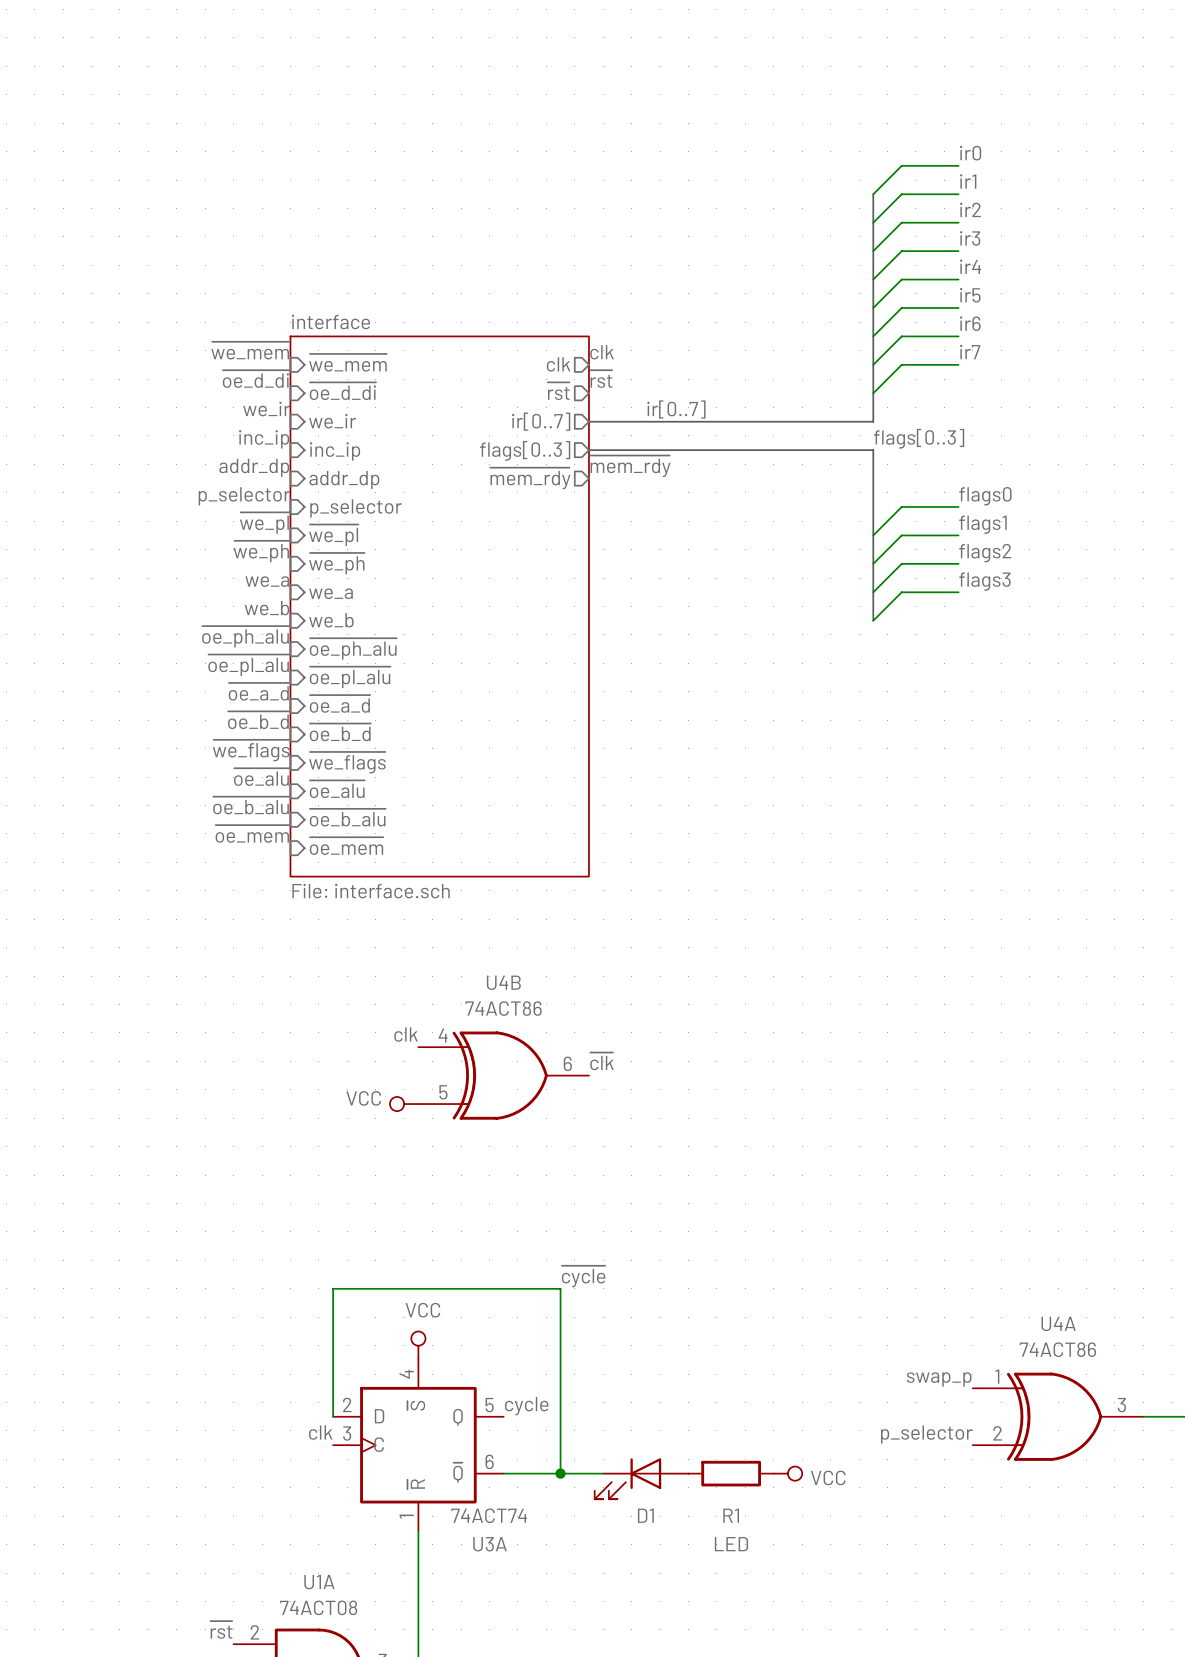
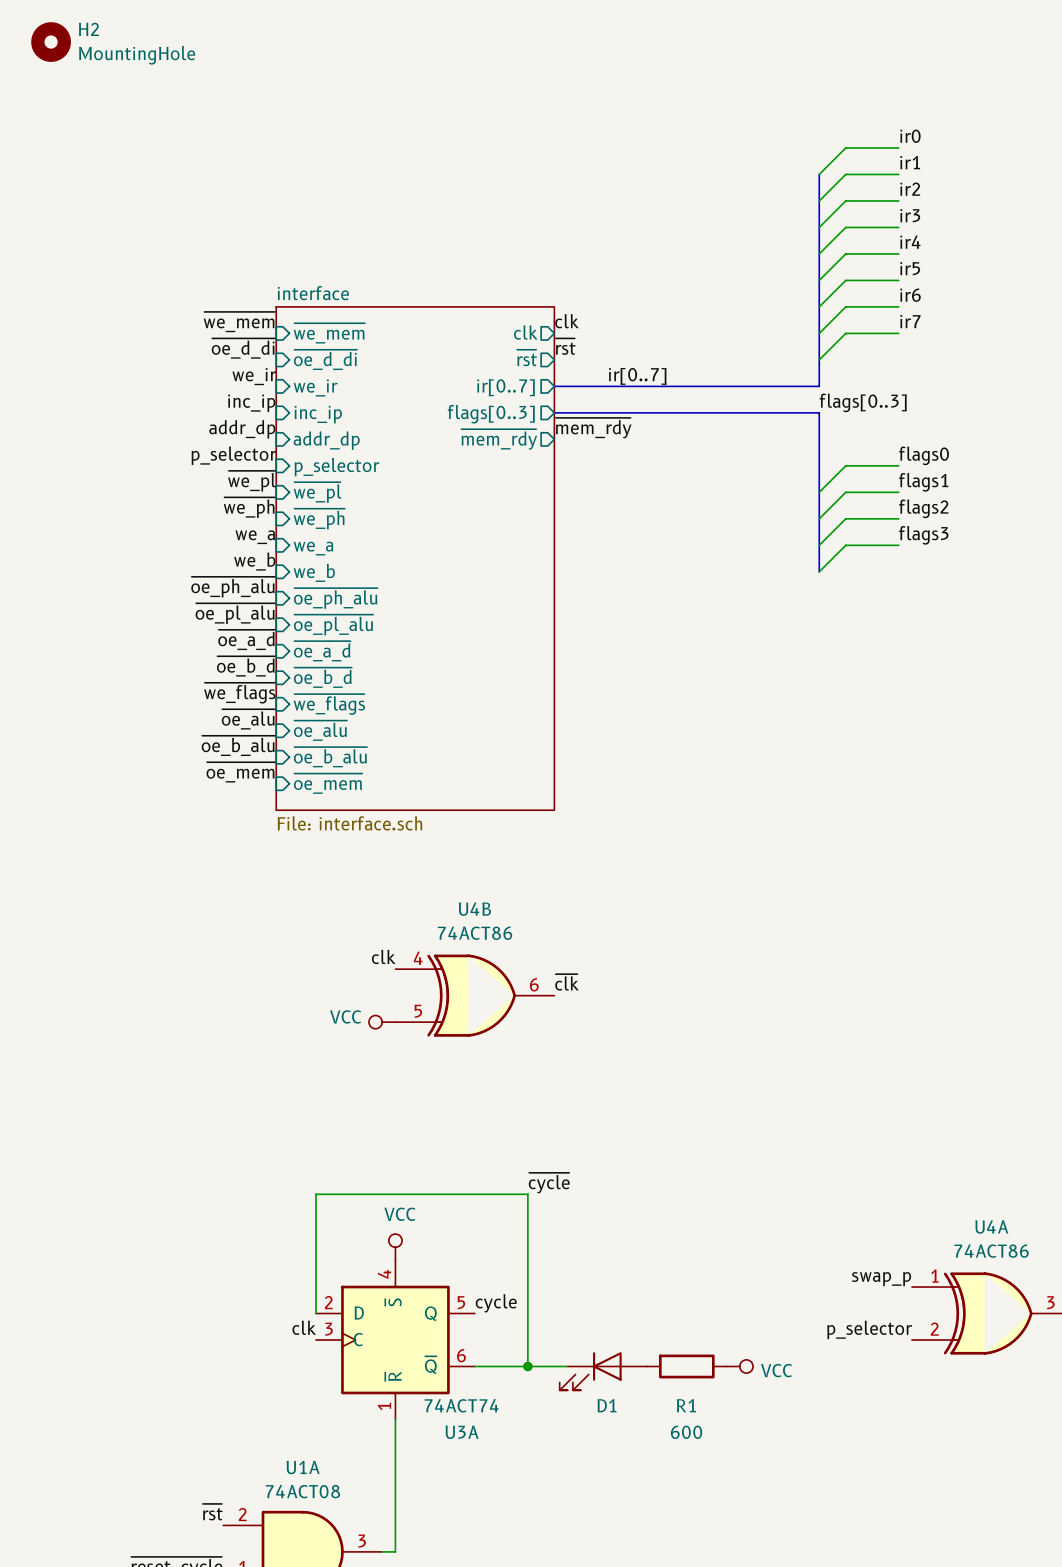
H2: none -> MountingHole (51, 42)
R1 value: LED (731, 1544) -> 600 (686, 1432)

